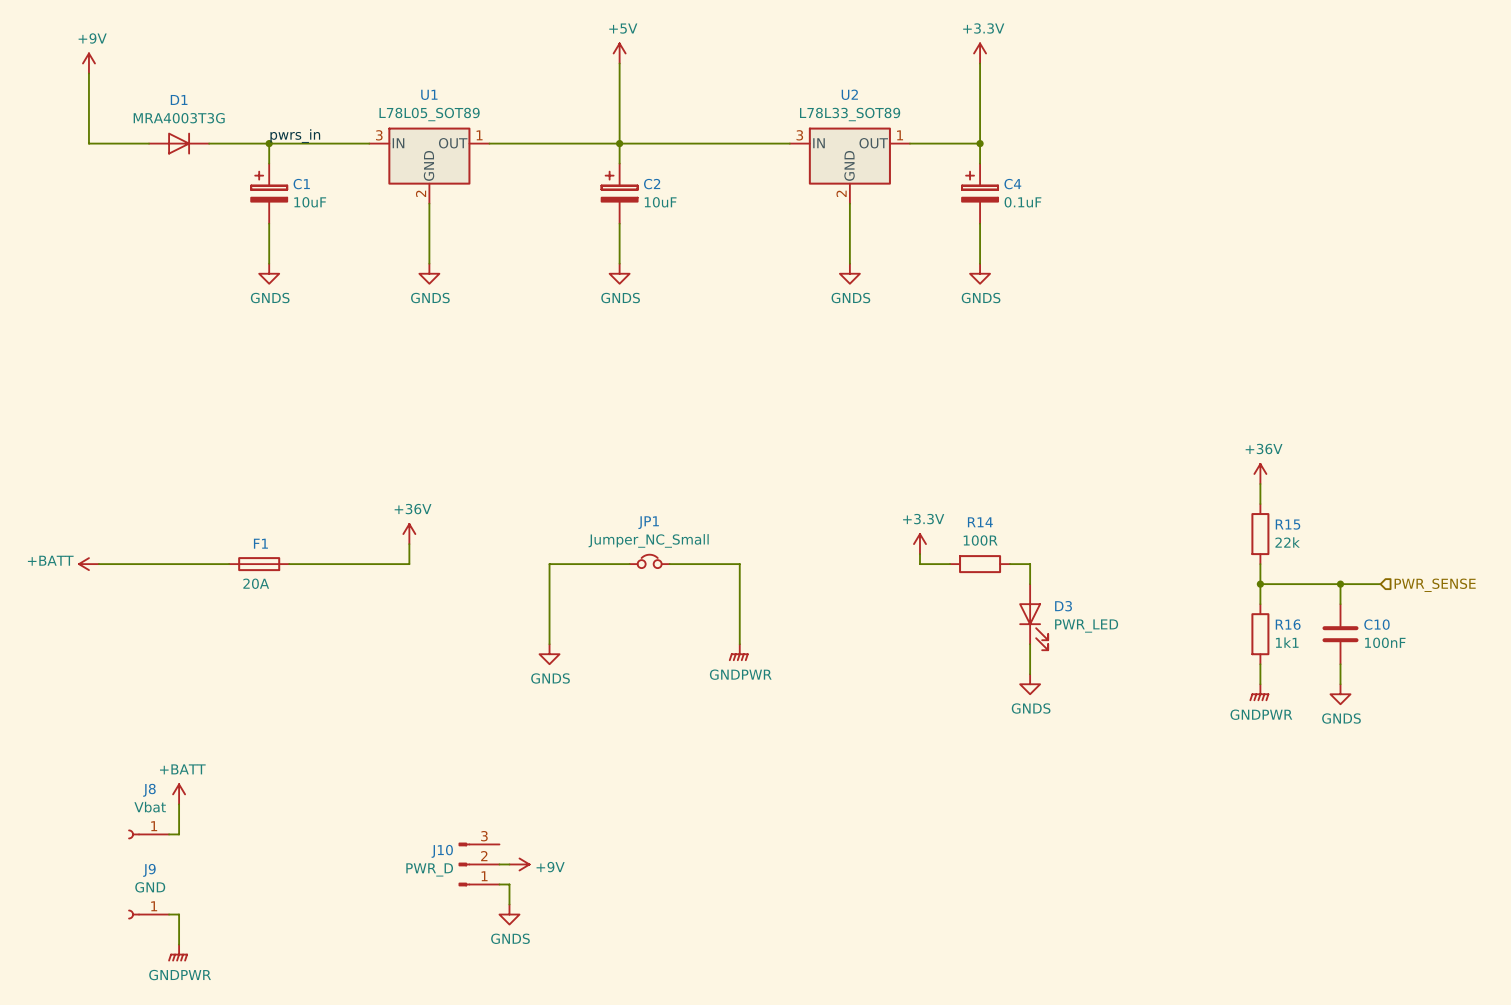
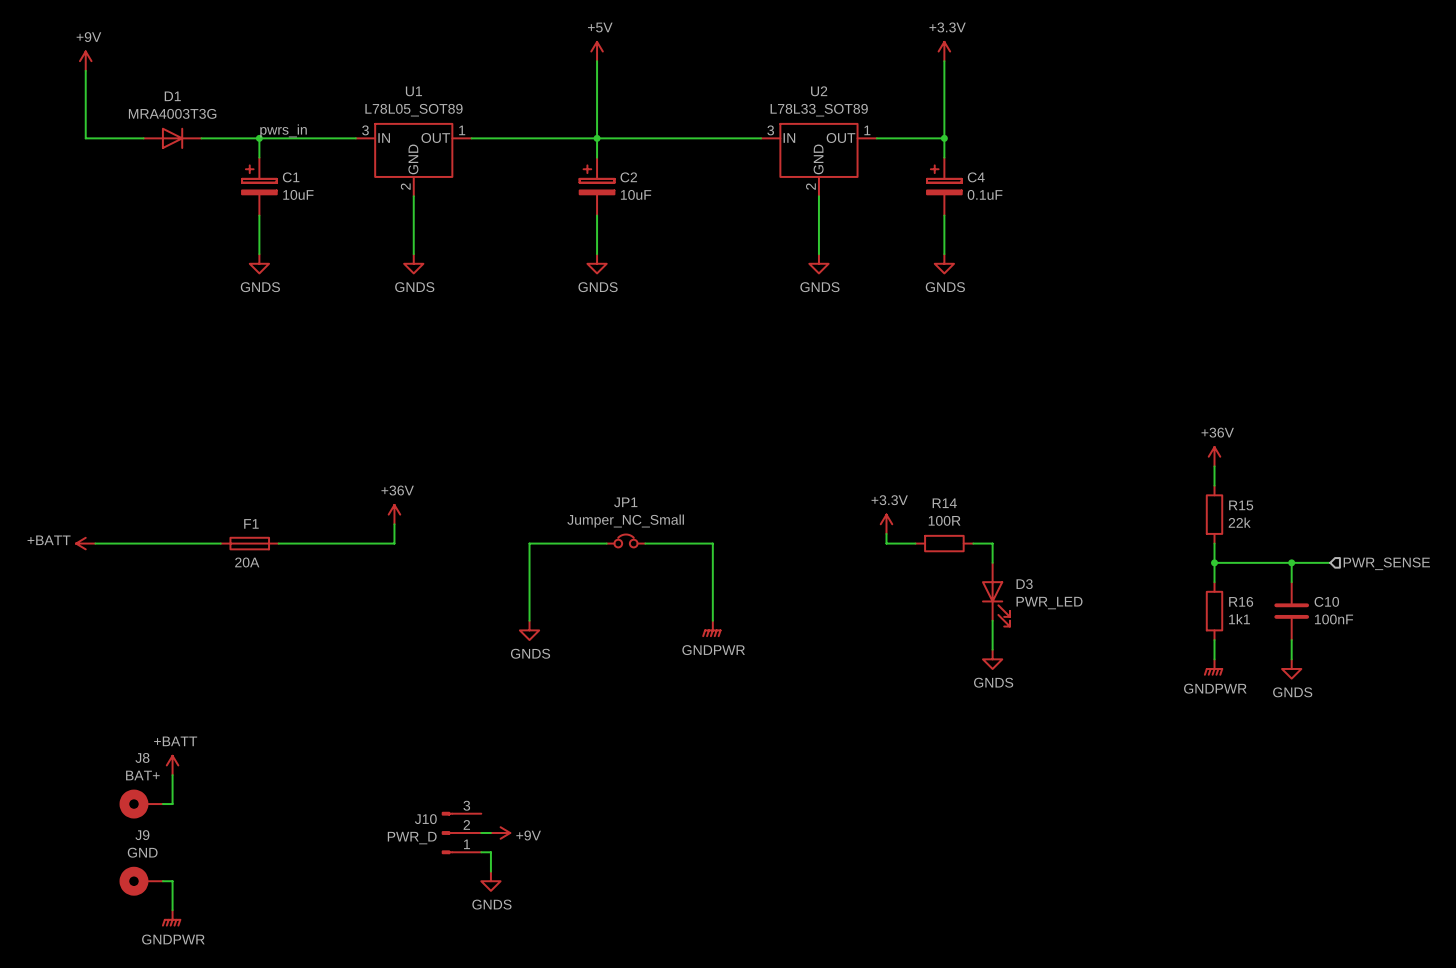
J8 value: Vbat (150, 807) -> BAT+ (142, 775)
J8 symbol: [128, 829, 170, 840] -> [119, 789, 163, 819]
J9 symbol: [128, 909, 170, 920] -> [119, 866, 163, 896]

